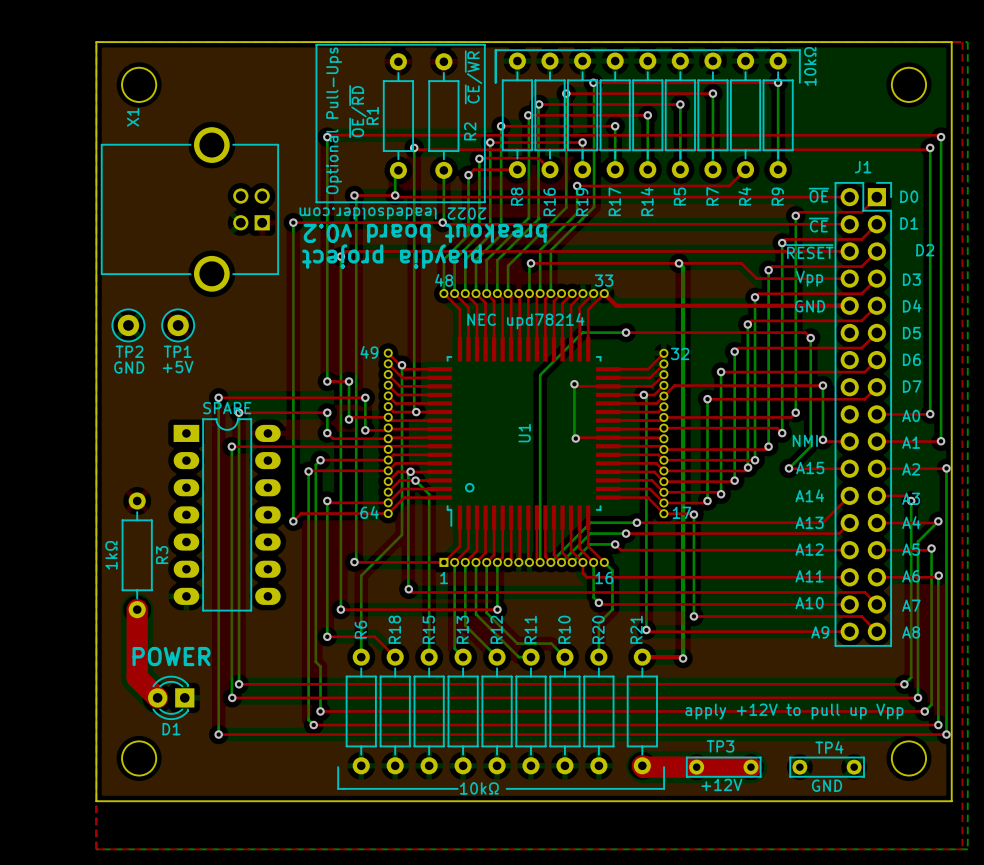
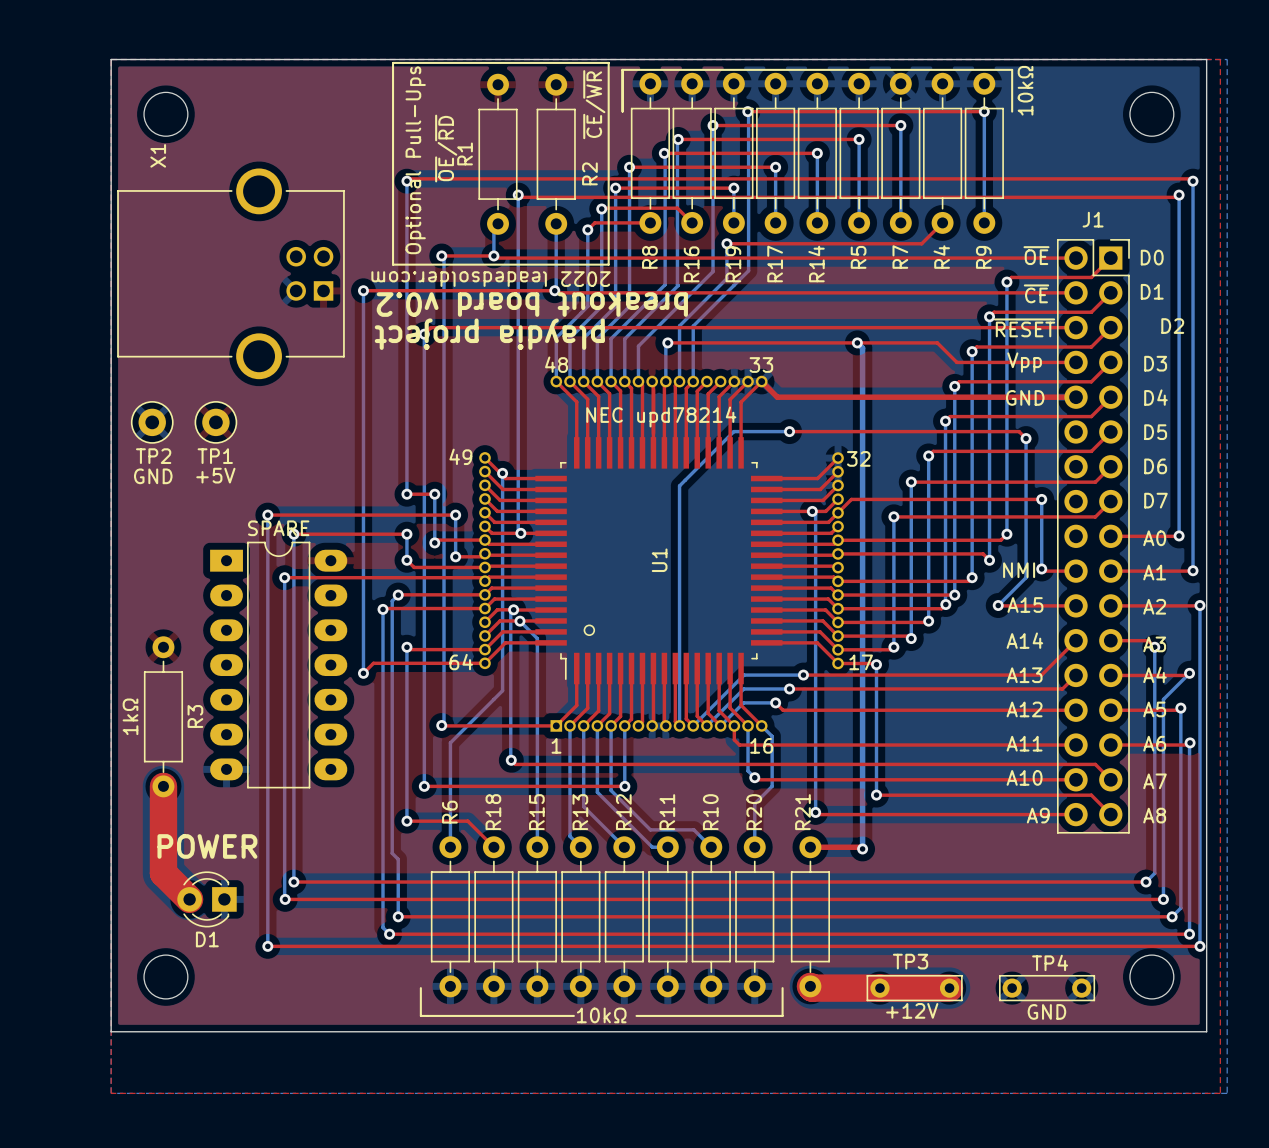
top track: (574, 384) (576, 386) (608, 386) -> none
bottom track: (574, 384) (575, 438) -> none
via: (574, 384) -> none
top track: (608, 437) (575, 438) -> none
via: (575, 438) -> none
text: apply +12V to pull up Vpp (794, 711) -> none
line: (664, 767) (664, 788) (620, 788) -> (782, 988) (782, 1015)

